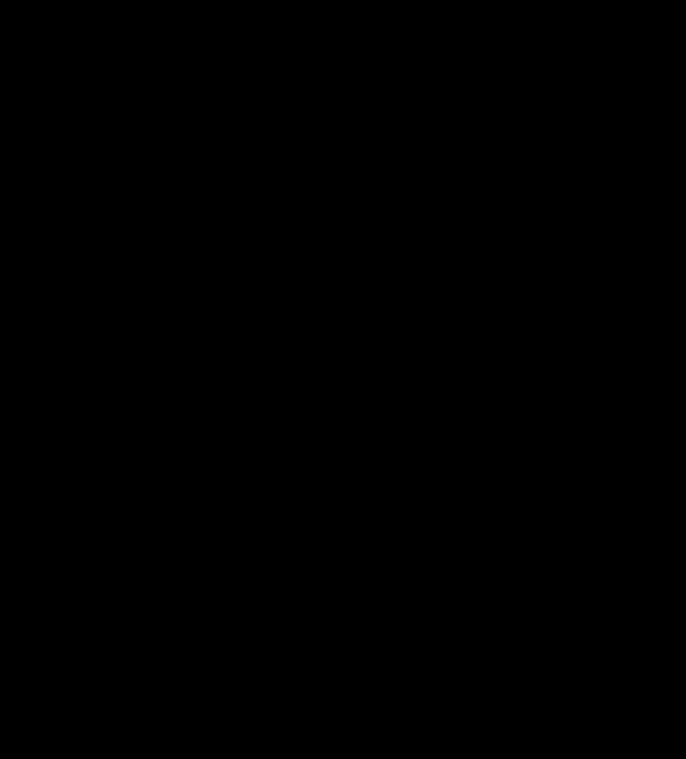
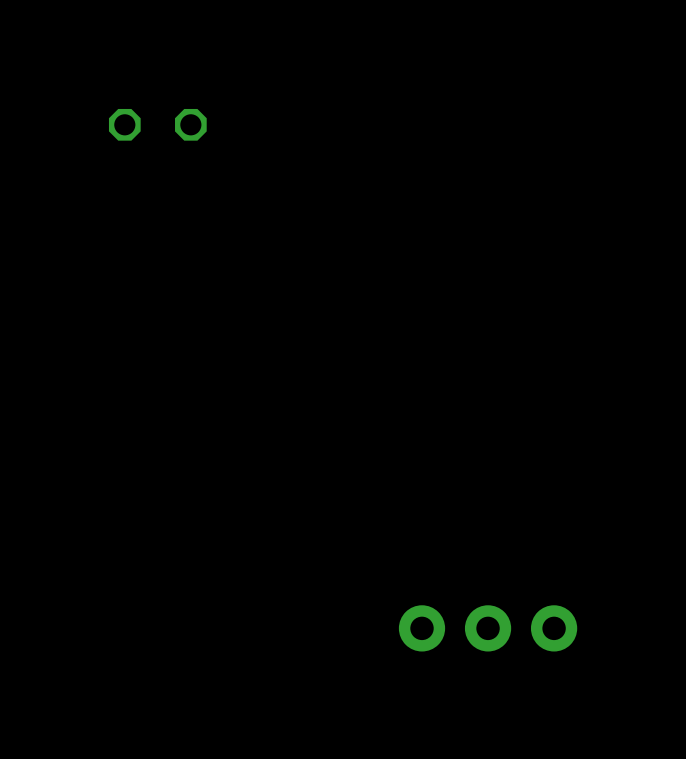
part: none -> (157, 124)
part: none -> (488, 628)

